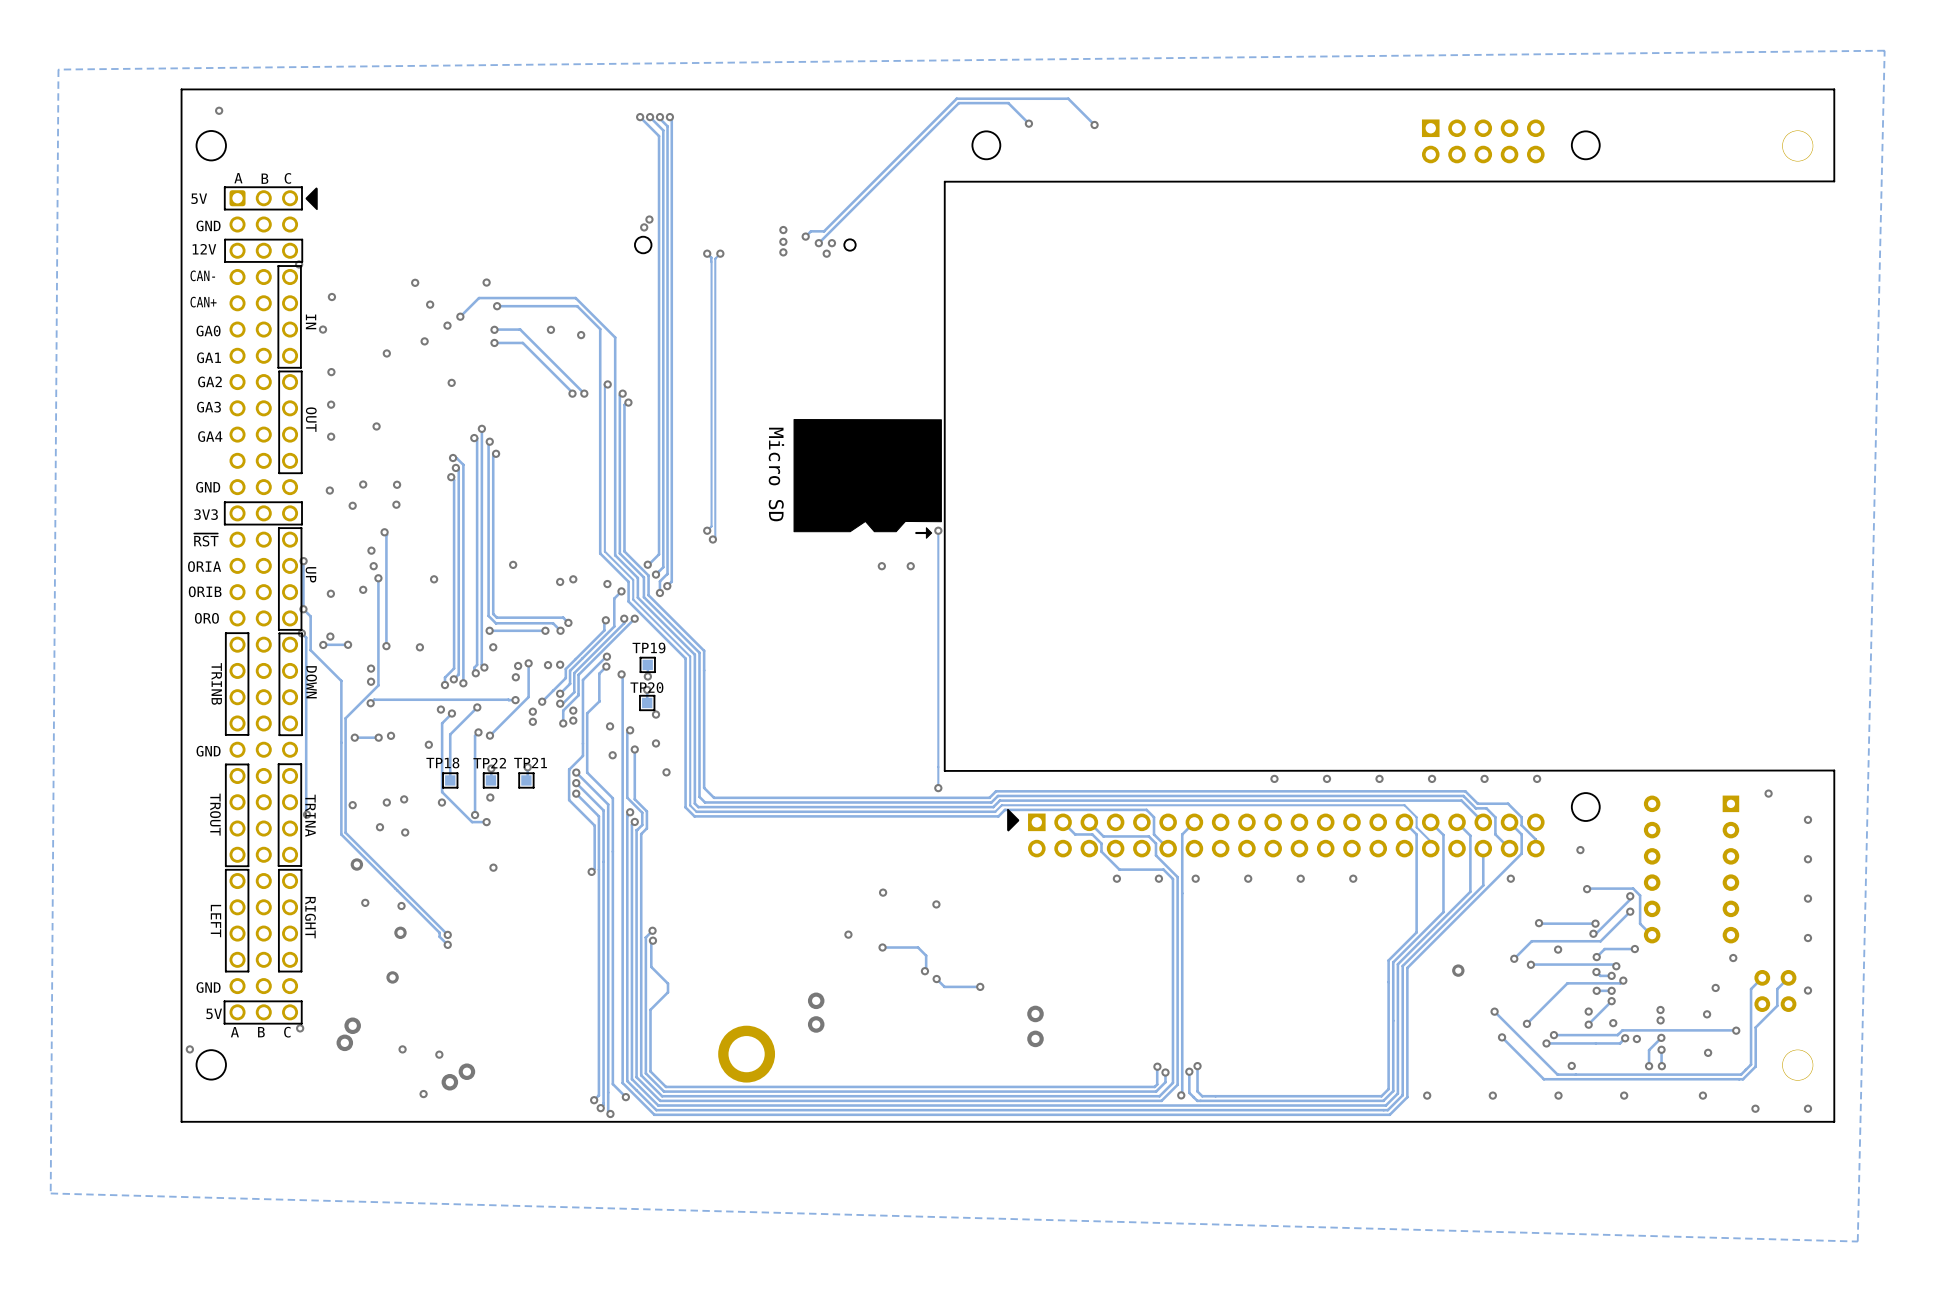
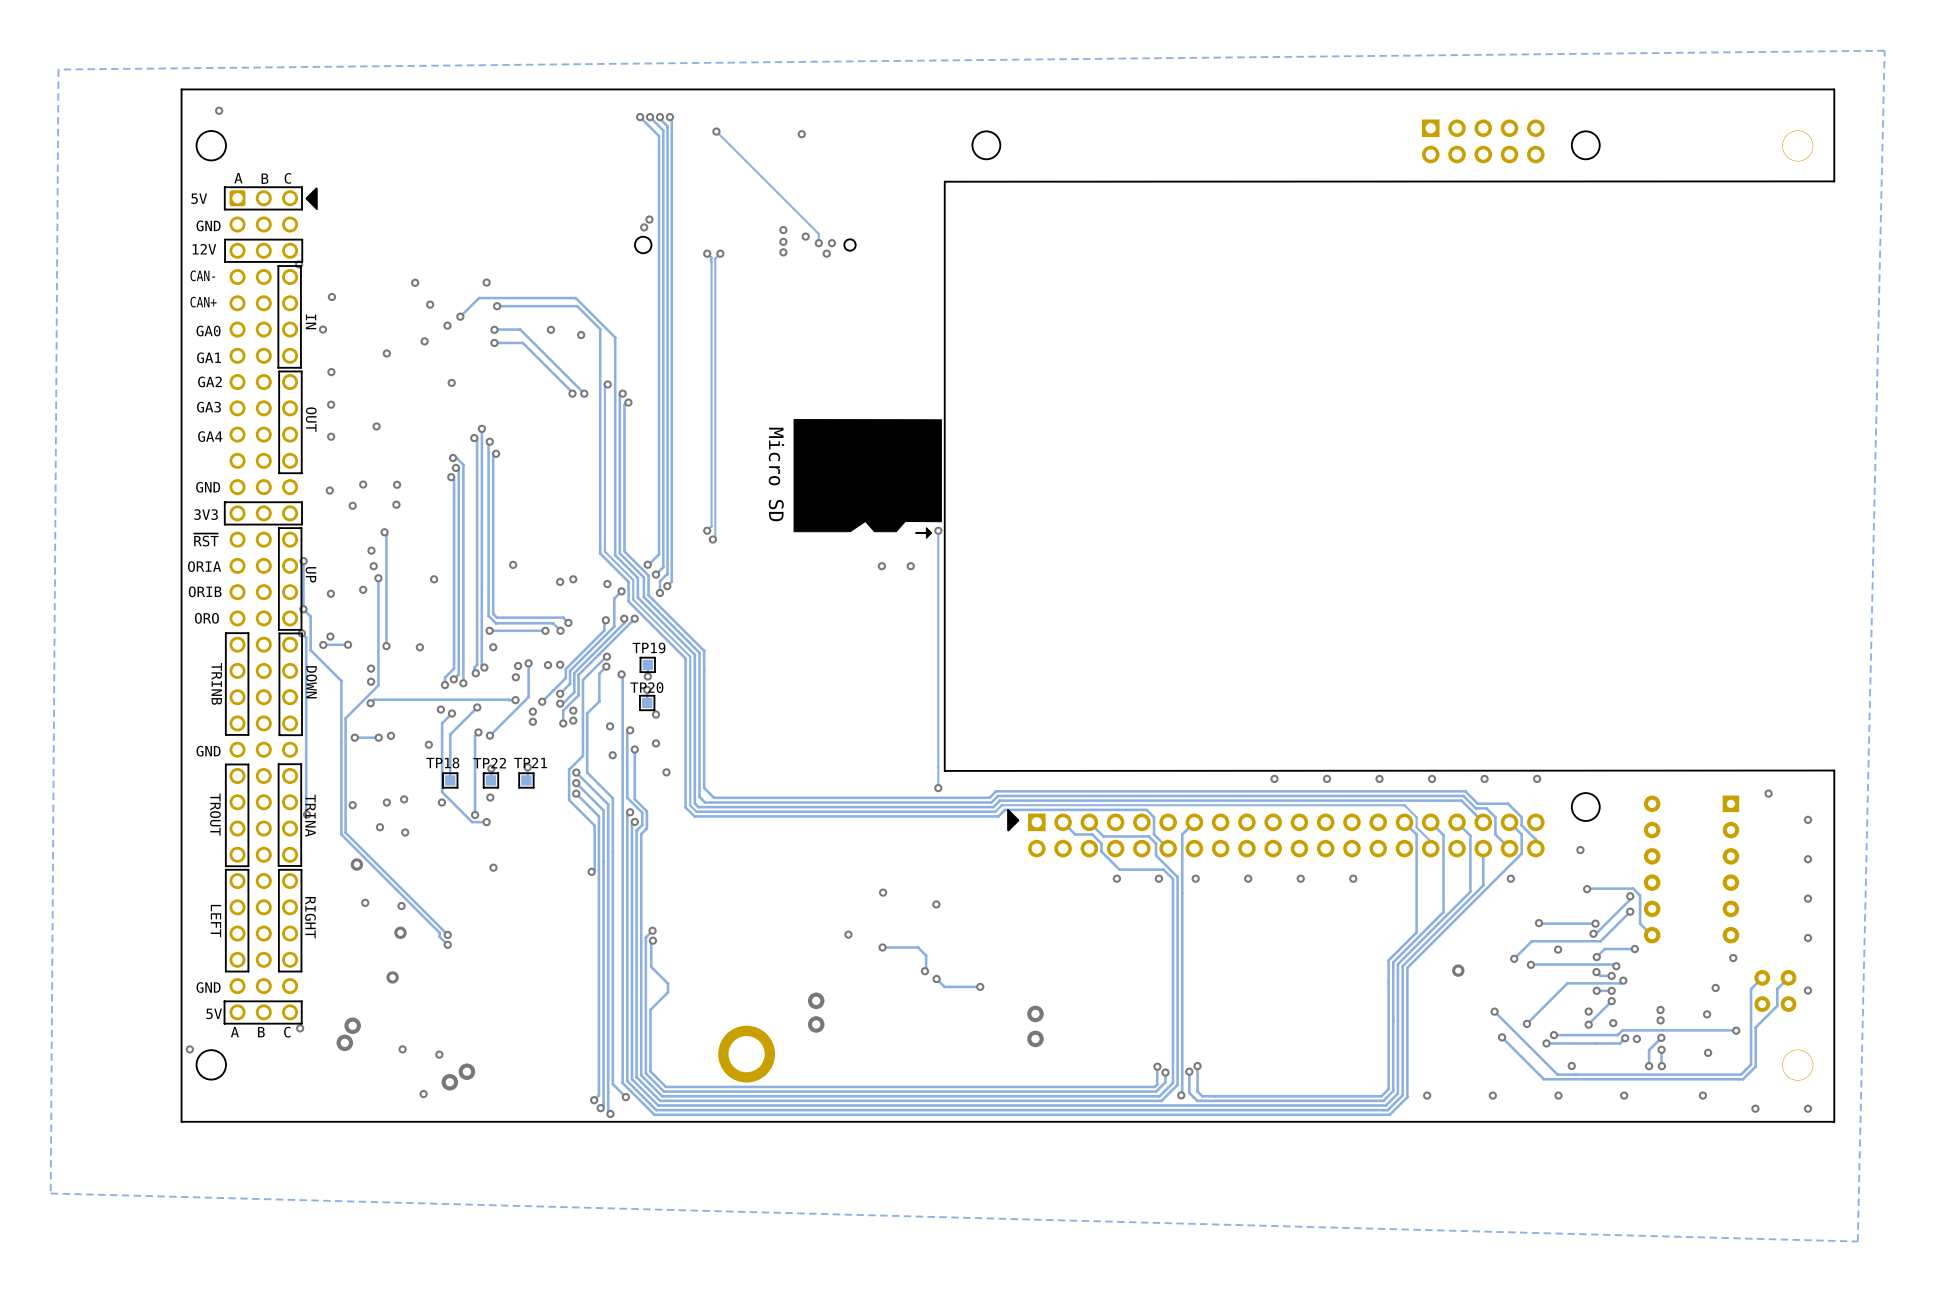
track: (1028, 123) (1008, 103) (958, 103) (818, 243) -> (716, 131) (818, 233) (818, 243)
via: (1028, 123) -> none
track: (1094, 124) (1068, 98) (956, 98) (824, 231) (810, 231) (805, 236) -> none
via: (1094, 124) -> none
via: none -> (716, 131)
via: none -> (801, 134)

